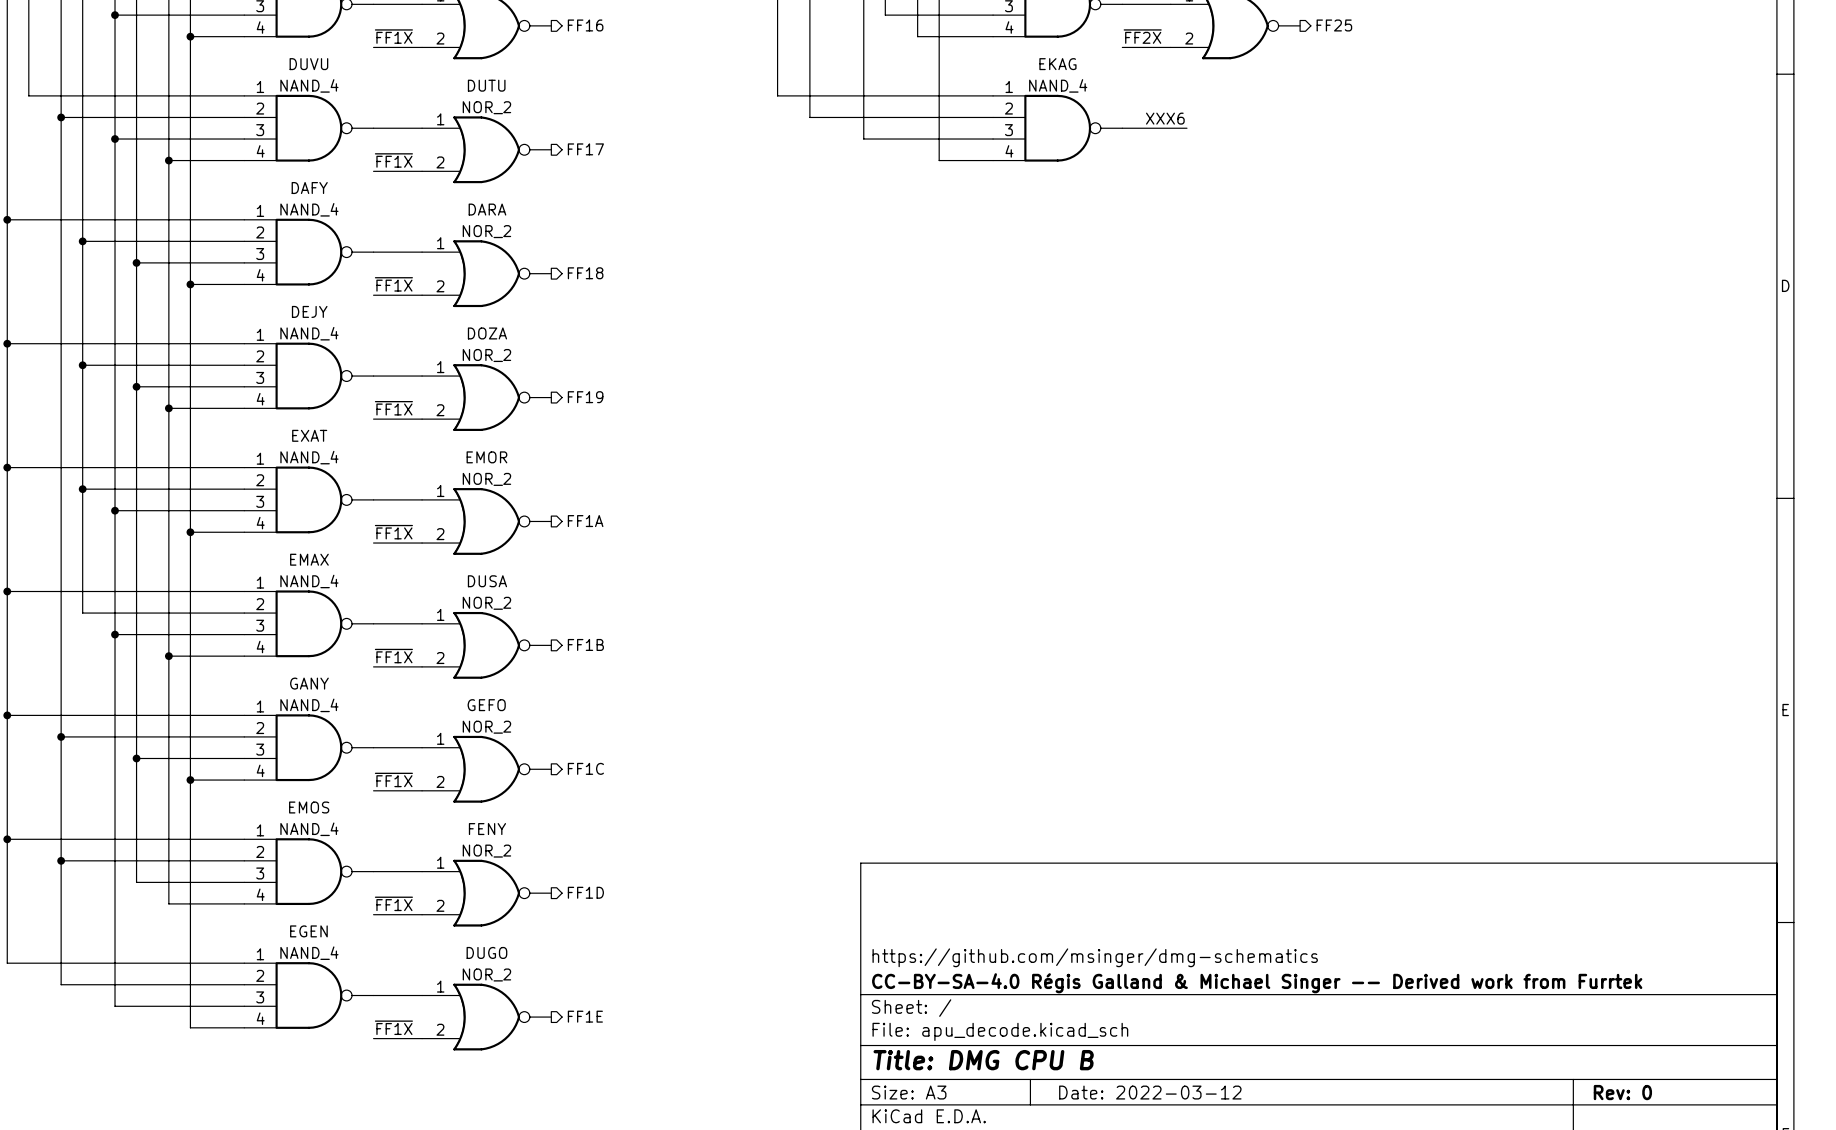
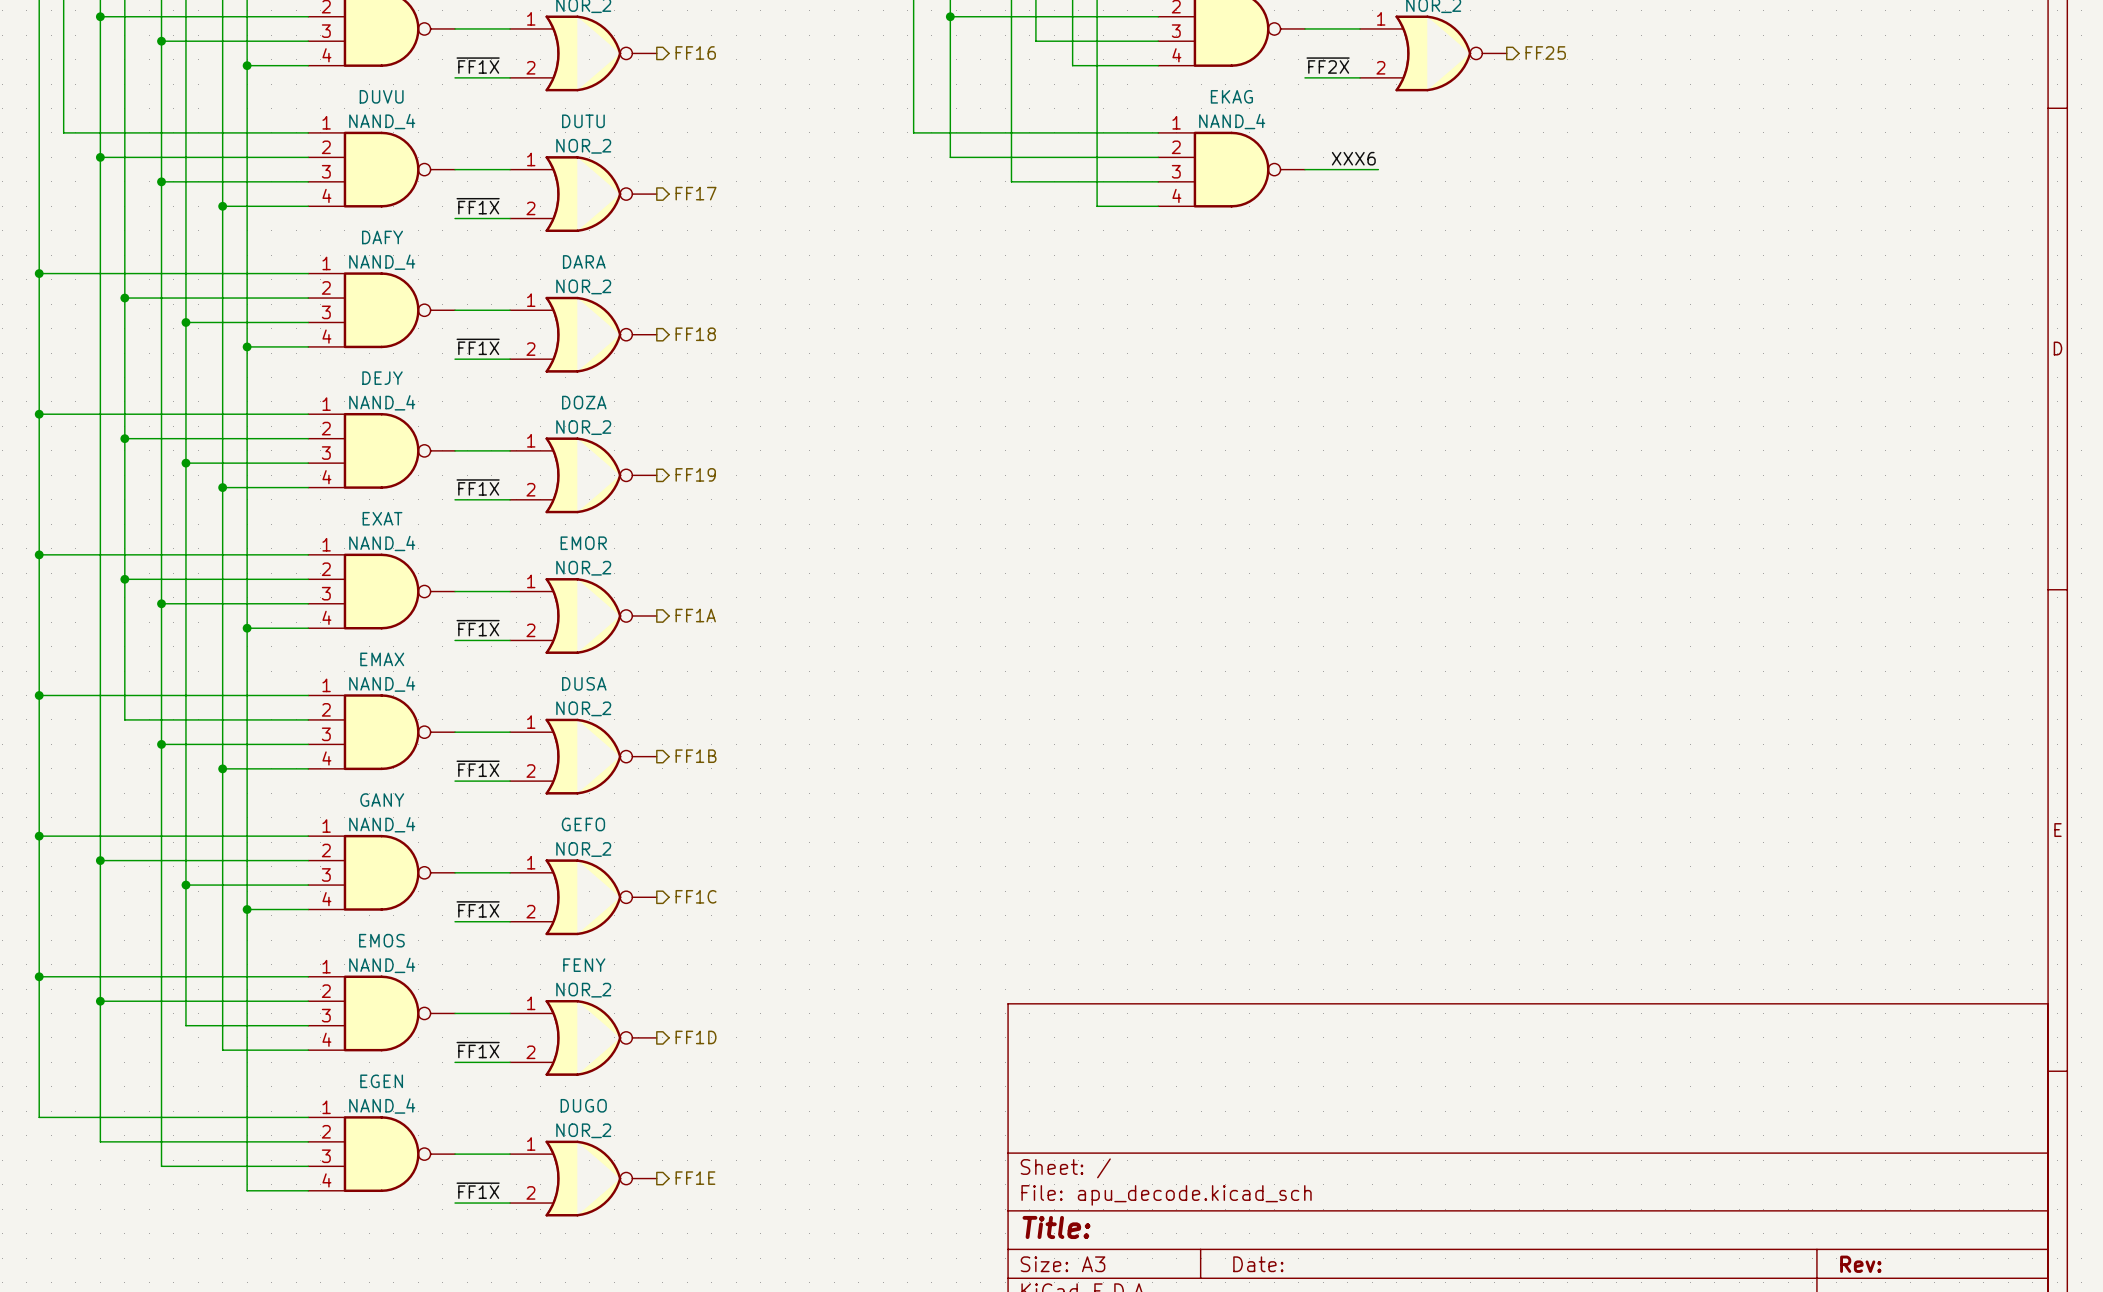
title block: https://github.com/msinger/dmg-schematics (1095, 957) -> none
title block: CC-BY-SA-4.0 Régis Galland & Michael Singer -- Derived work from Furrtek (1257, 983) -> none
title block: Title: DMG CPU B (983, 1060) -> Title: (1056, 1227)
title block: Date: 2022-03-12 (1150, 1092) -> Date: (1258, 1264)
title block: Rev: 0 (1622, 1092) -> Rev: (1860, 1264)

